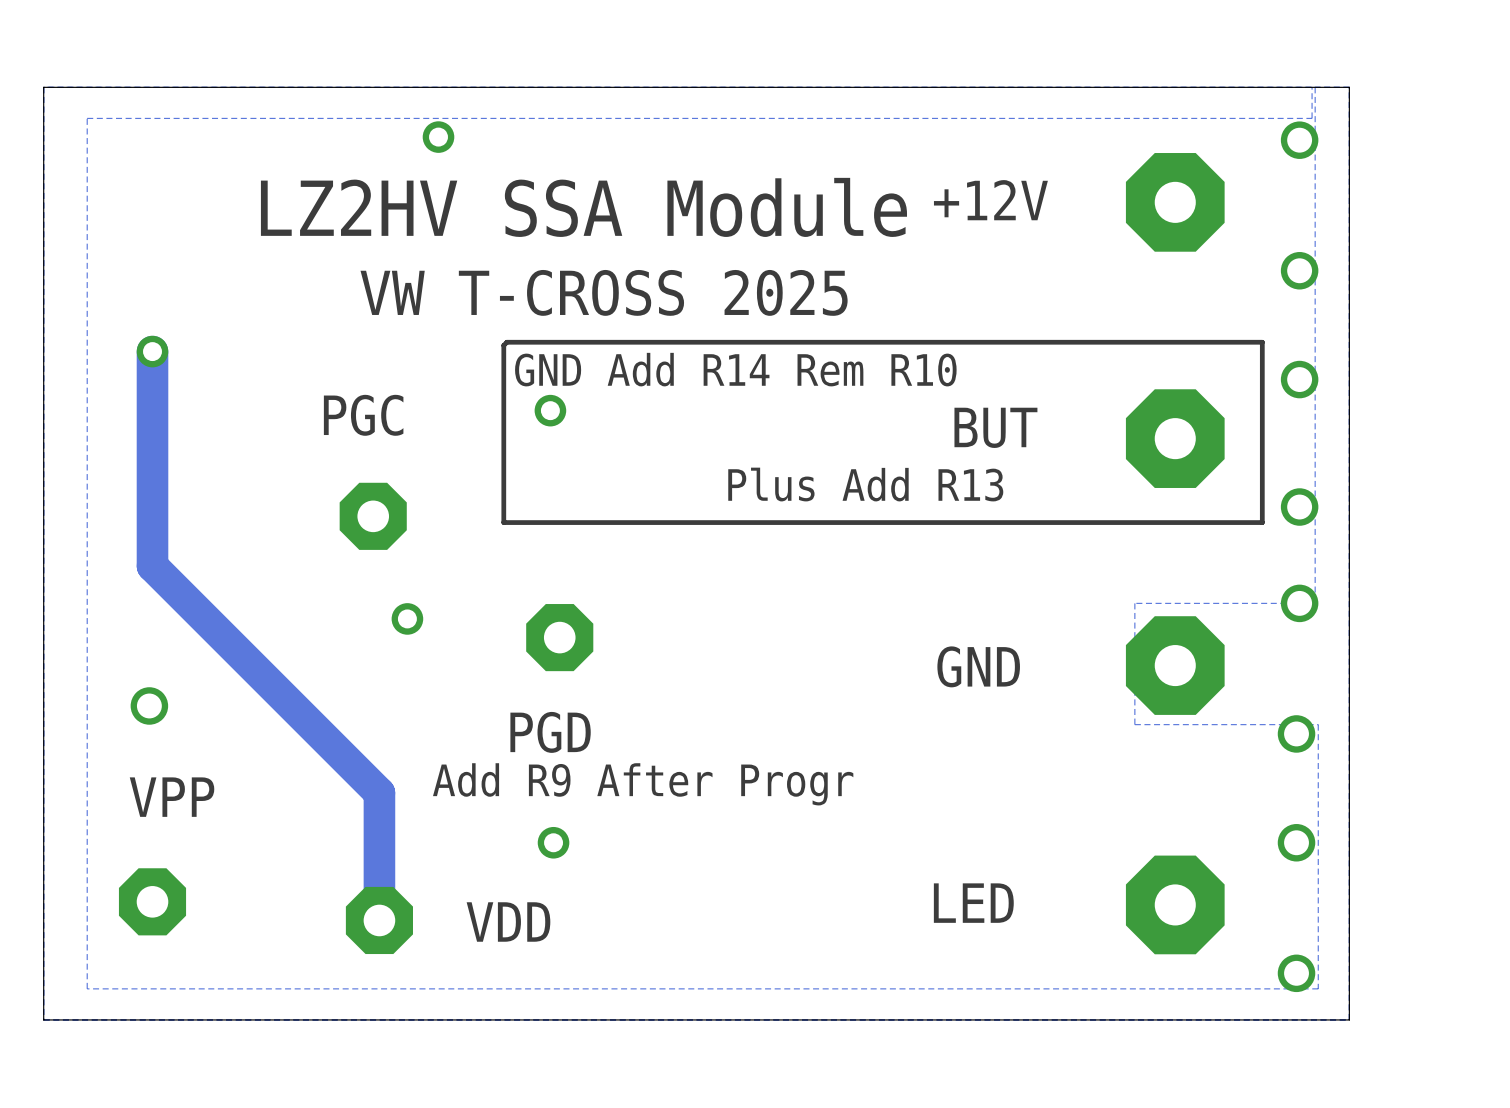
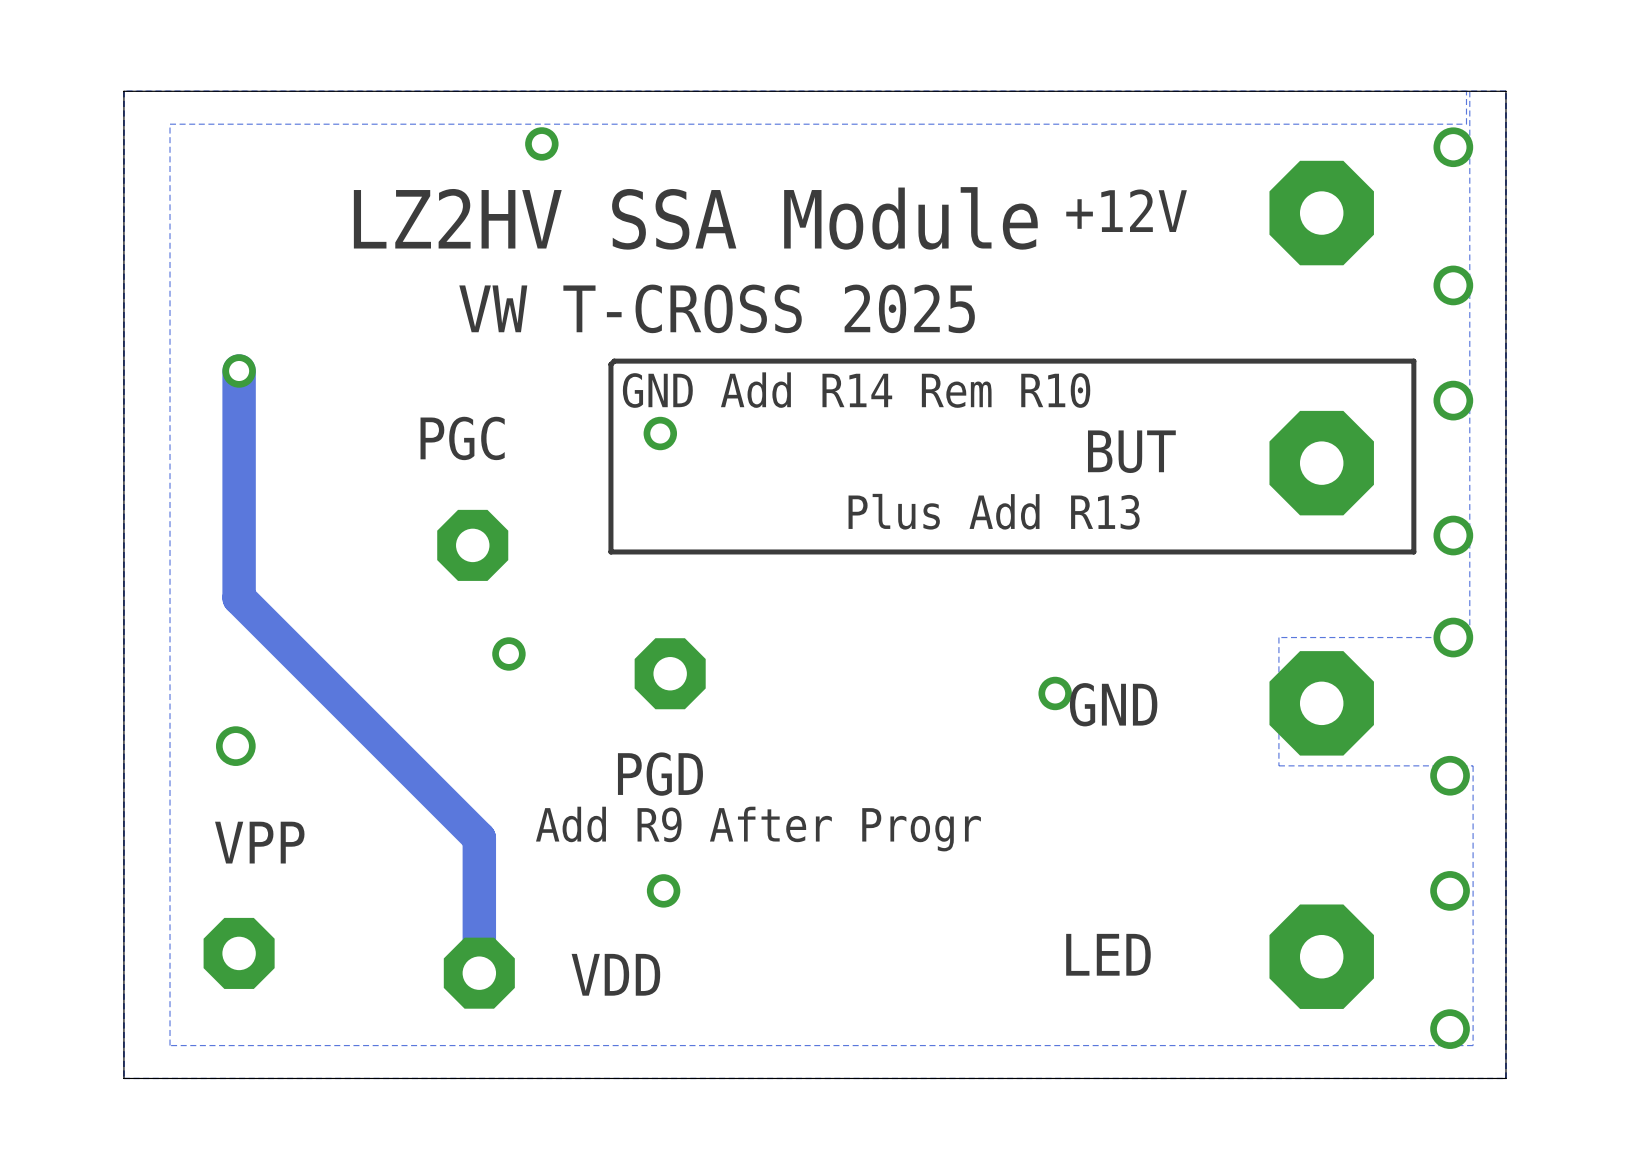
via: none -> (1055, 693)

